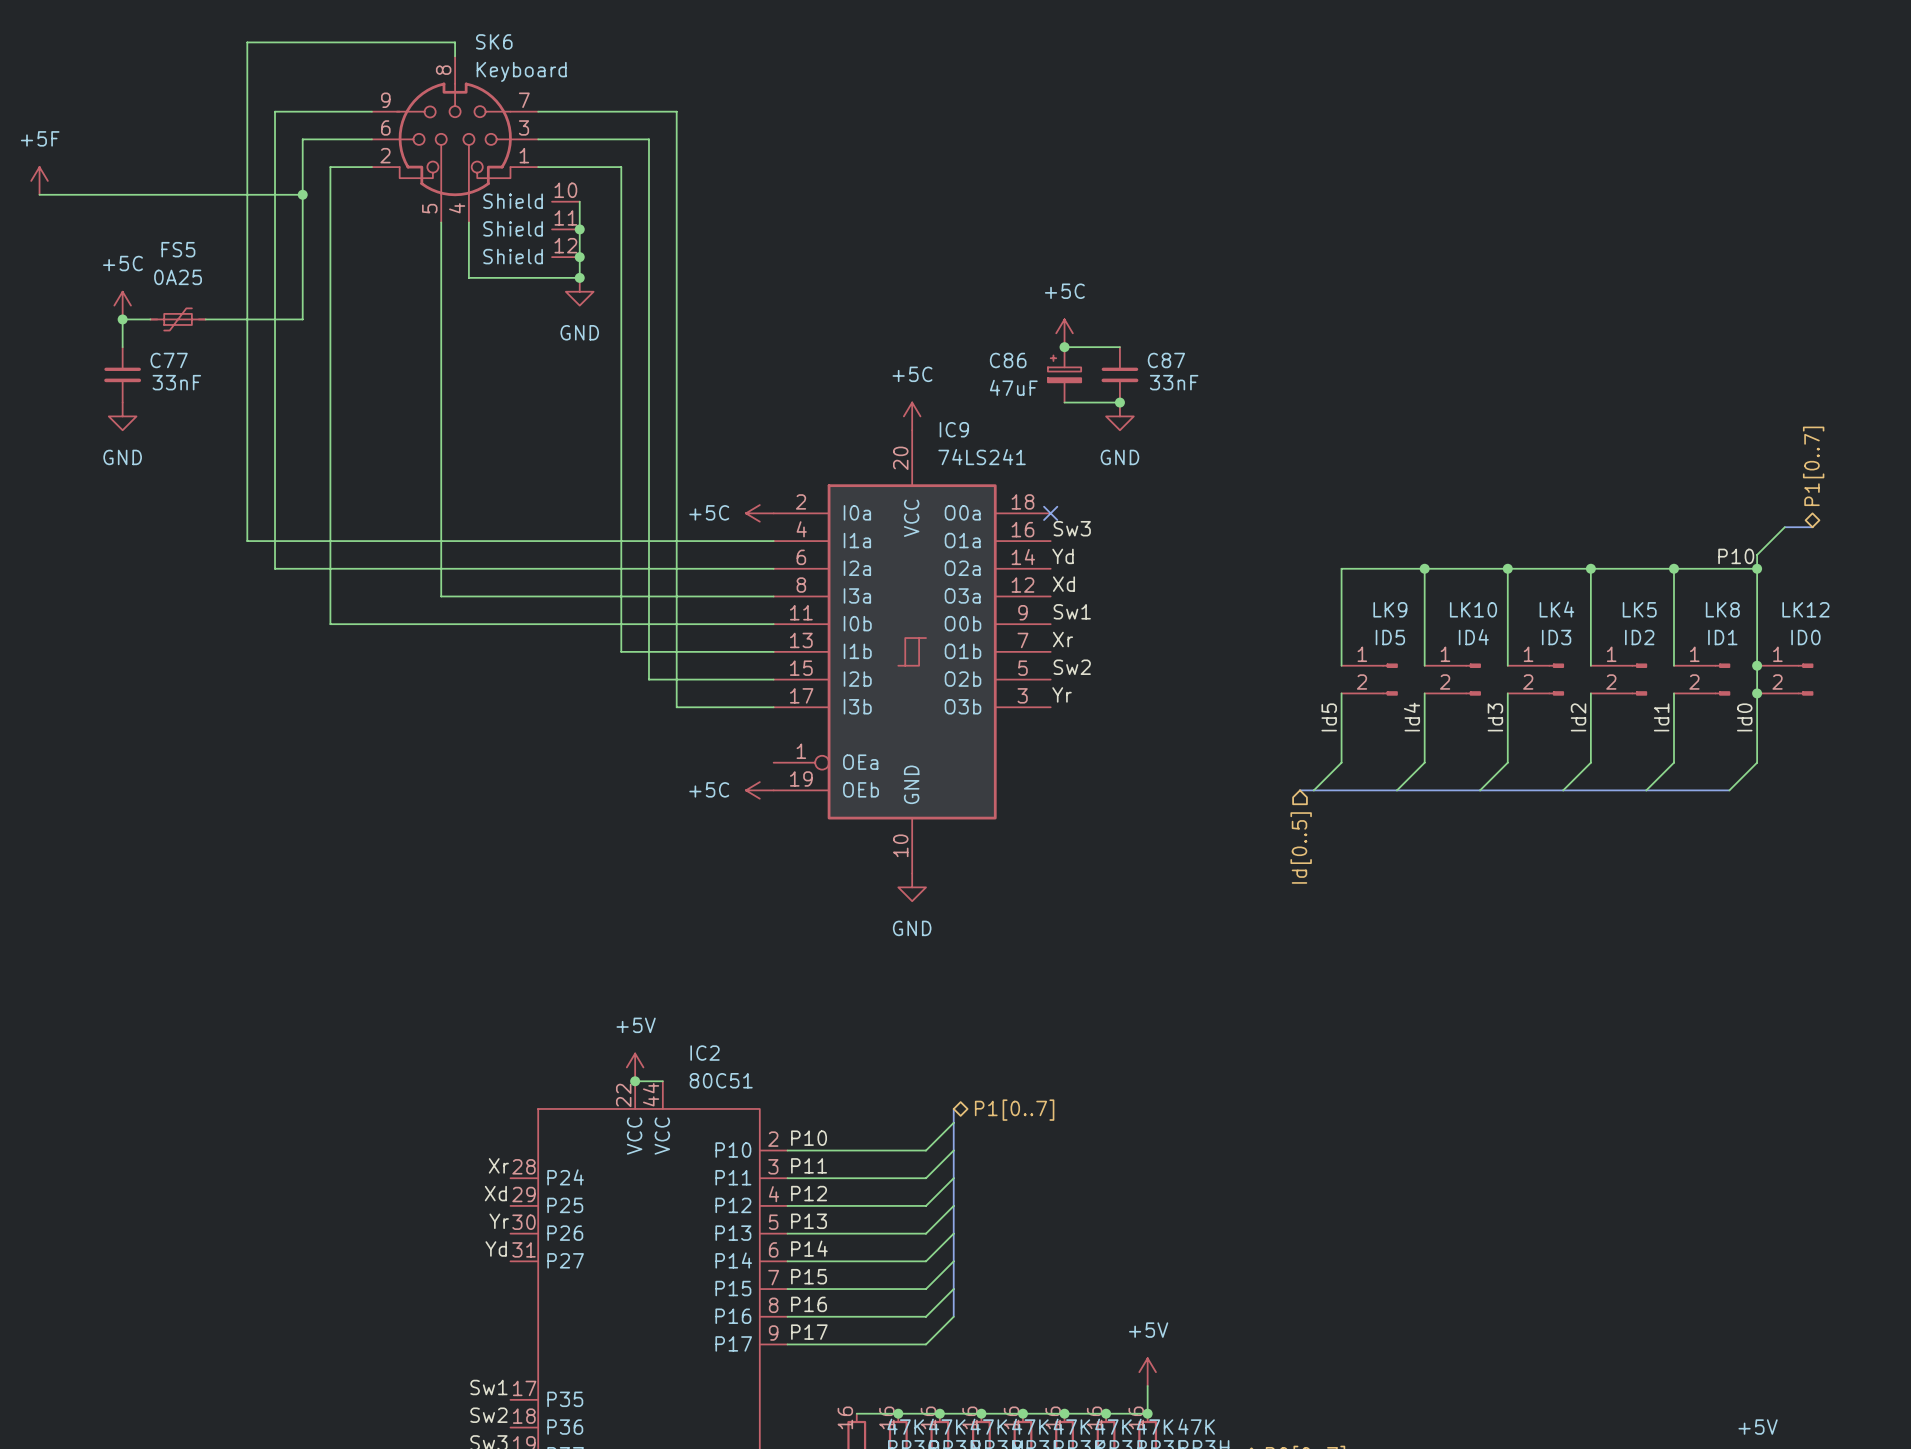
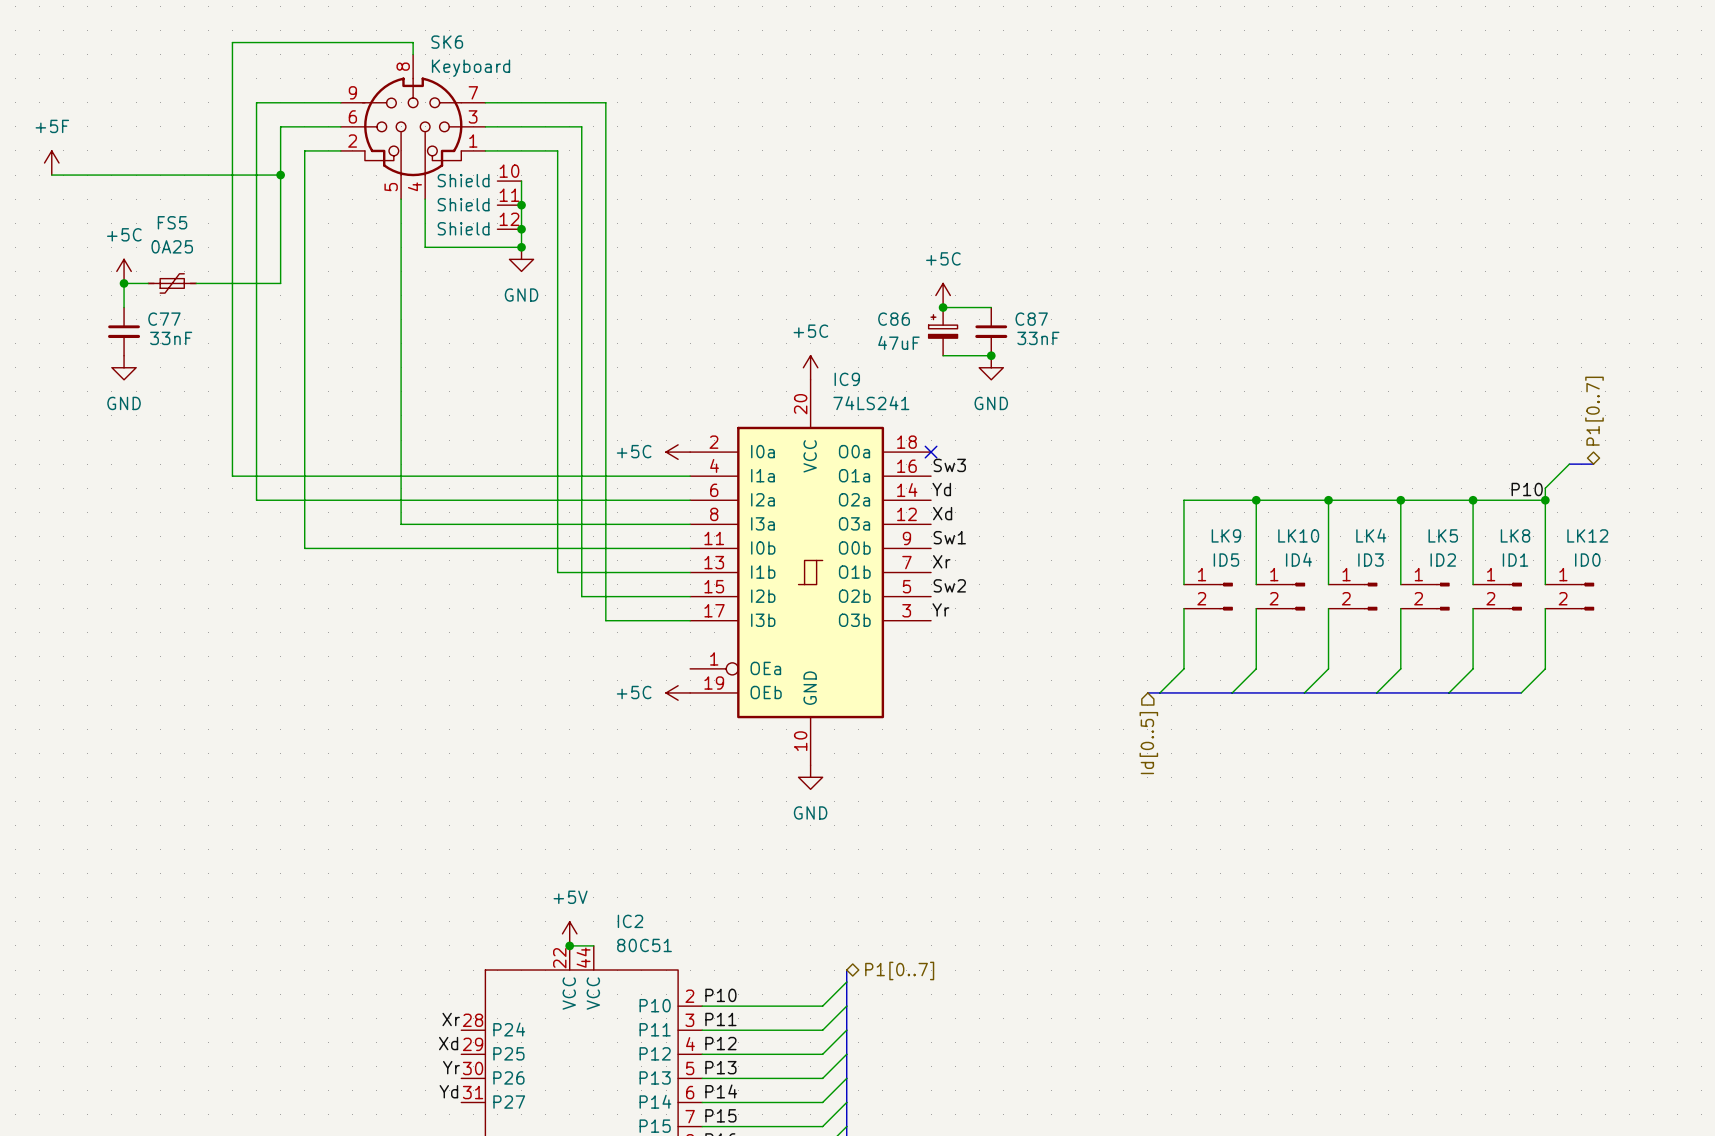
wire: (1757, 665) (1757, 693) -> none
junction: (1757, 665) -> none
junction: (1757, 693) -> none
label: Id5 (1329, 717) -> none
label: Id4 (1411, 717) -> none
label: Id3 (1495, 717) -> none
label: Id2 (1578, 717) -> none
label: Id1 (1661, 717) -> none
label: Id0 (1744, 717) -> none

